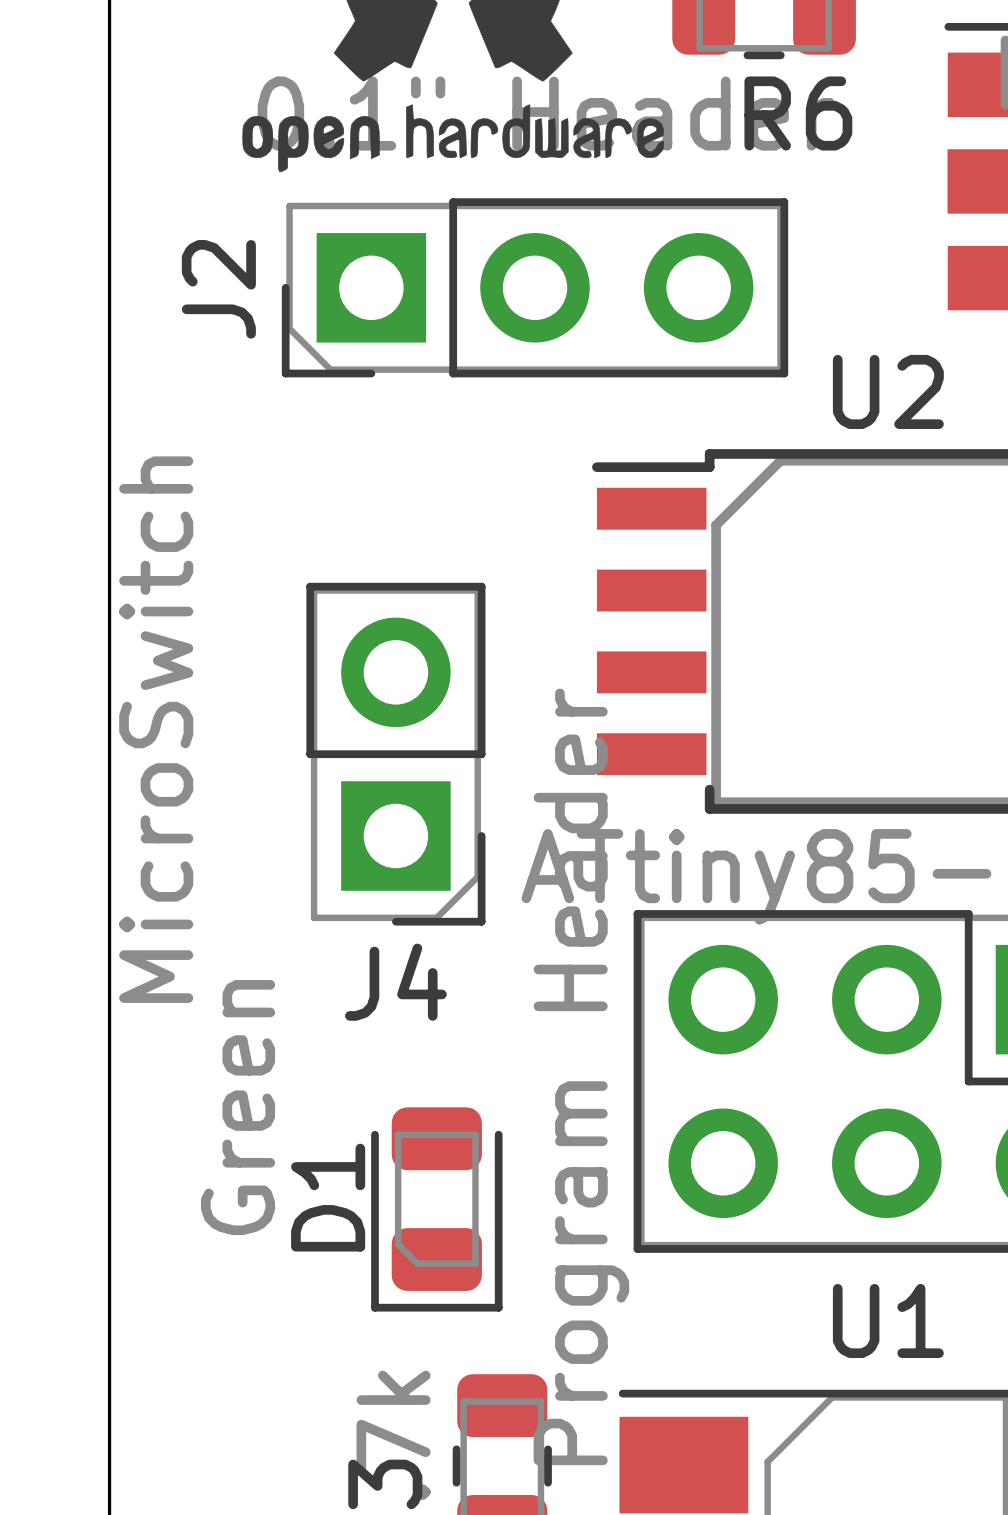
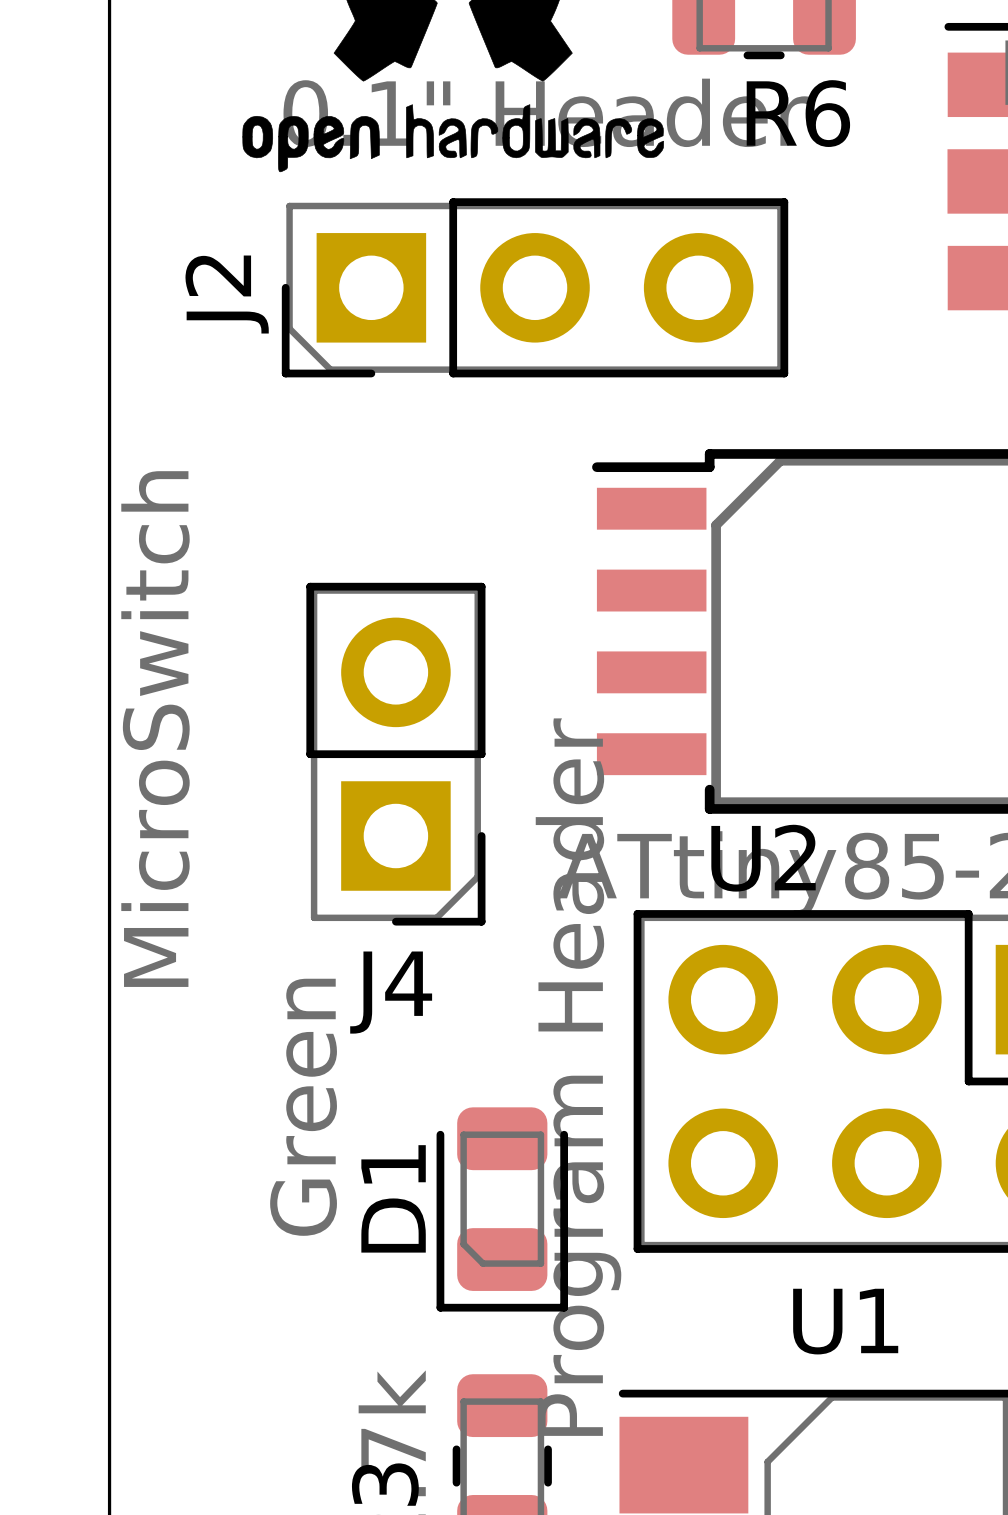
U2 name position: U2 (888, 391) -> U2 (763, 858)
D1 position: (436, 1209) -> (502, 1209)
U1 name position: U1 (888, 1320) -> U1 (845, 1321)

